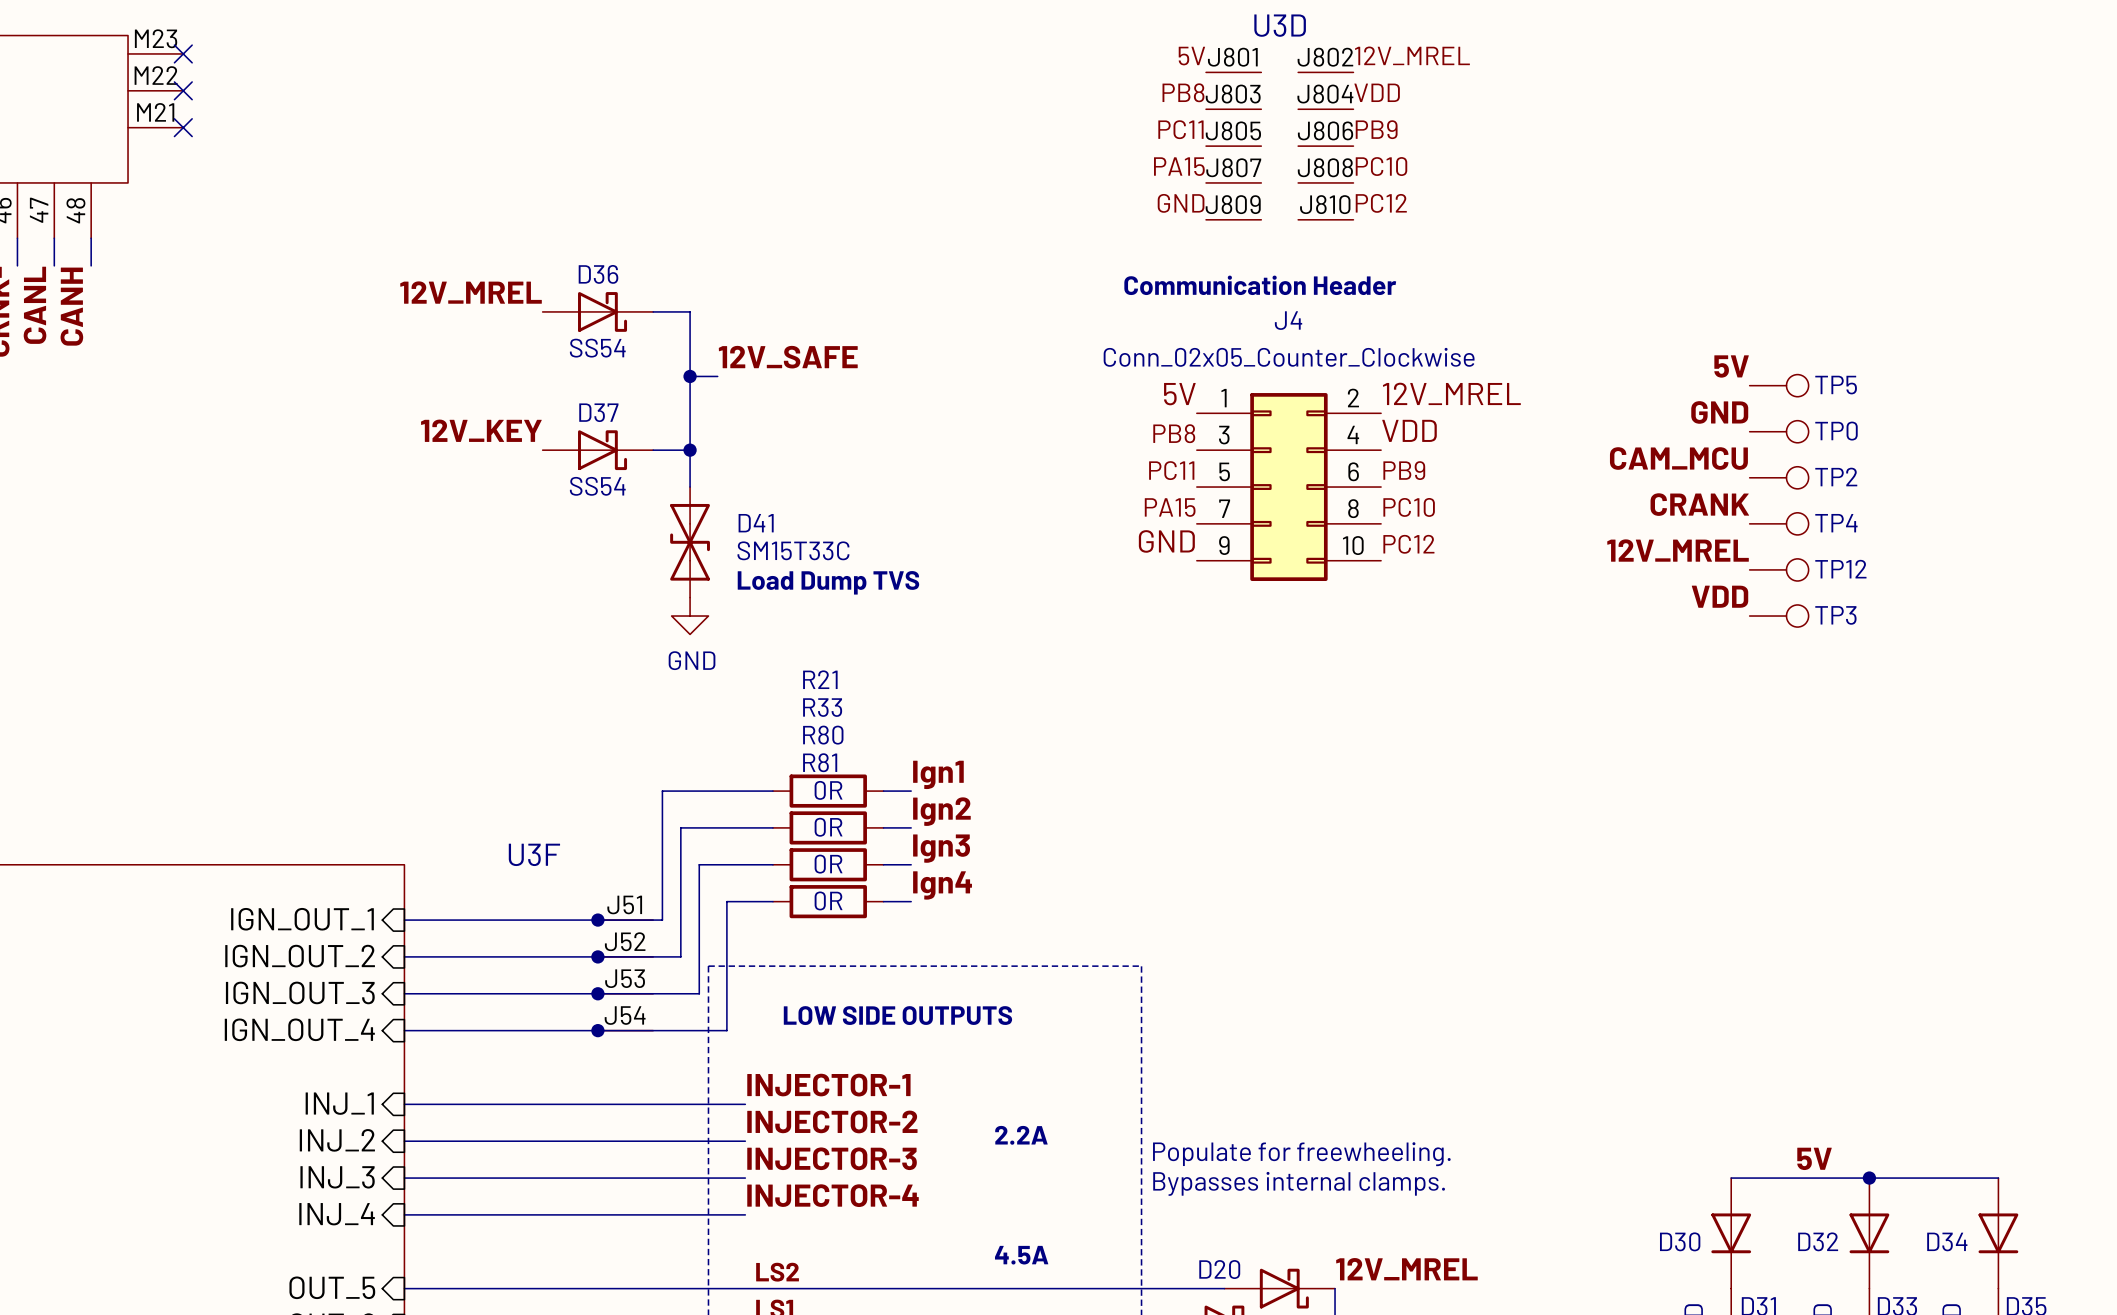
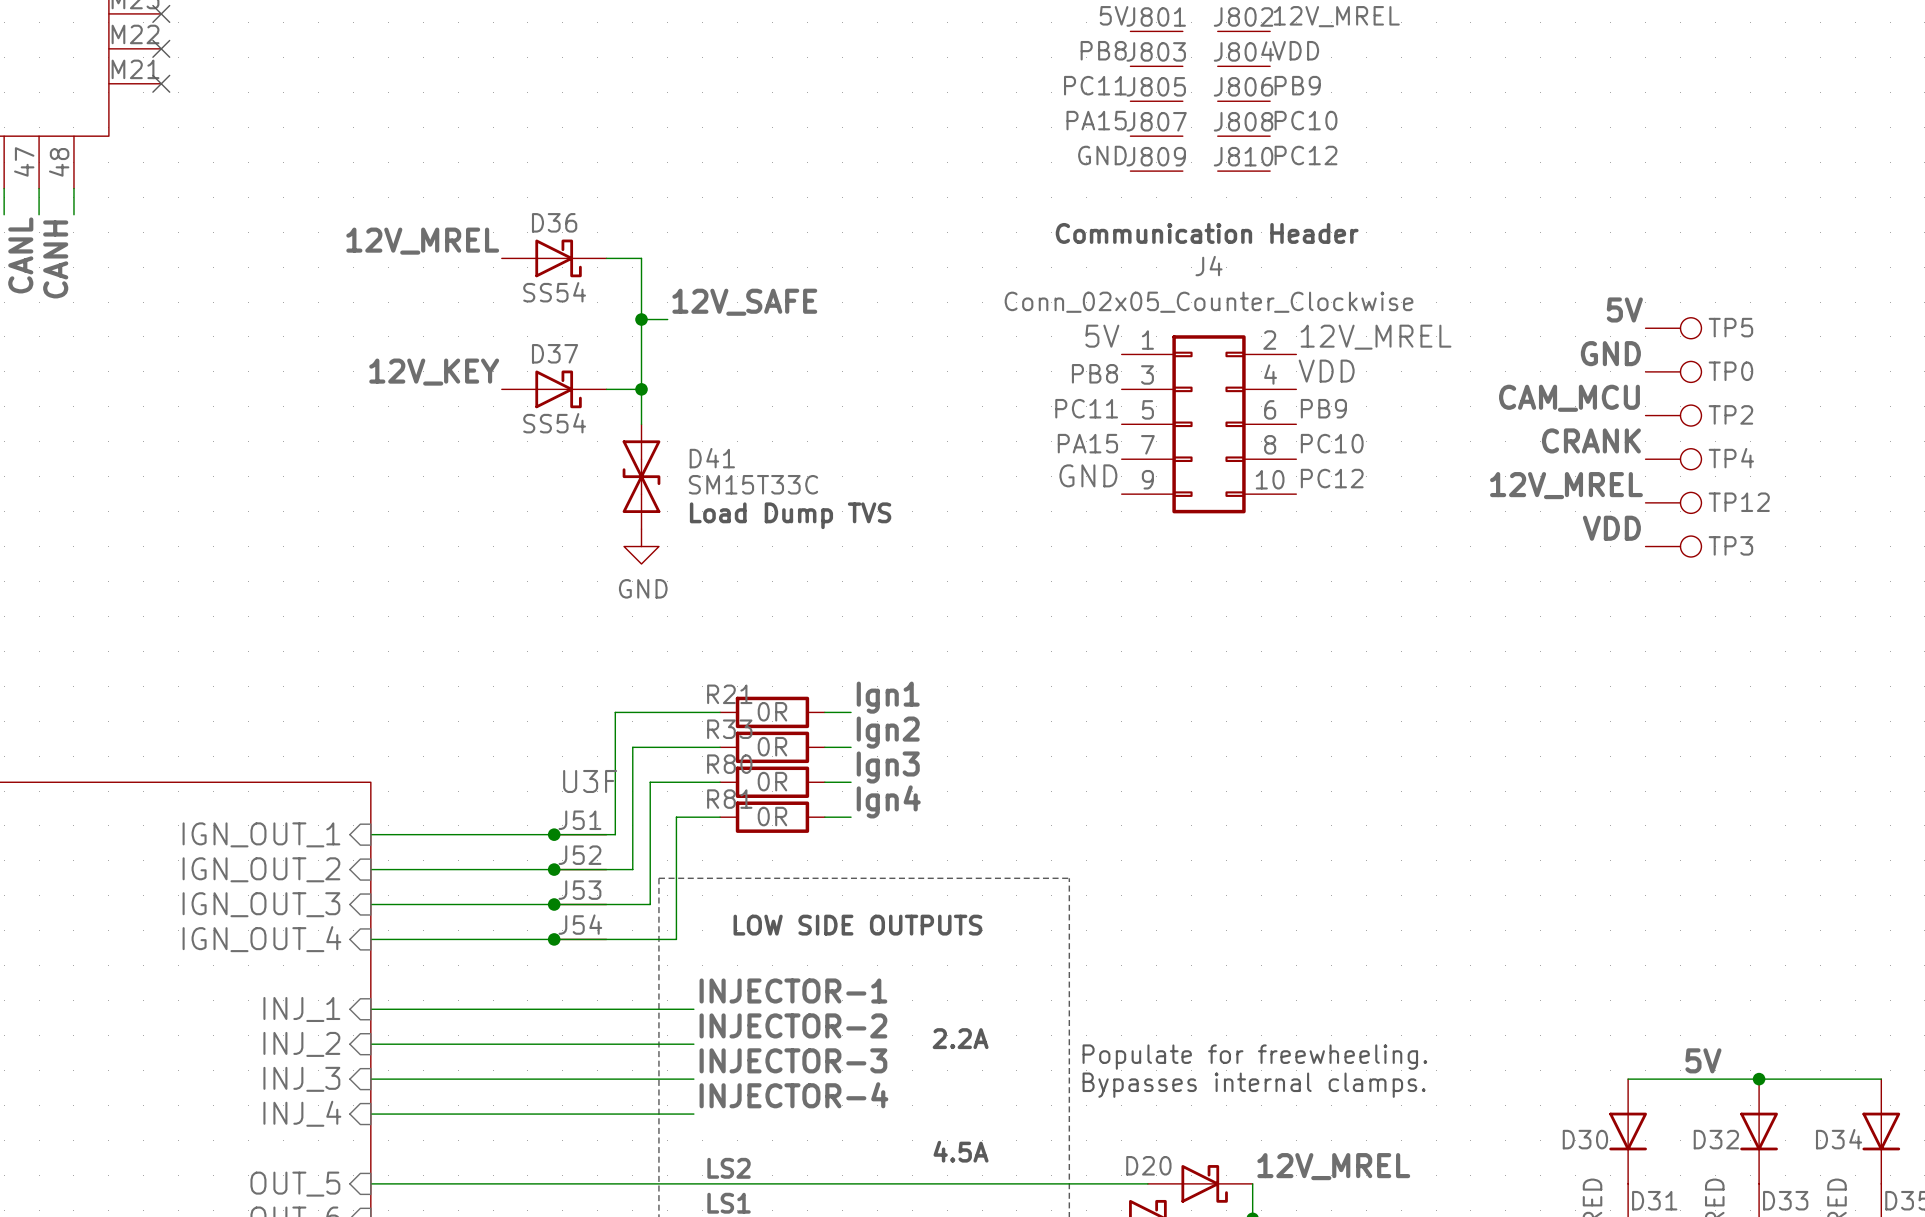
R21 name position: R21 (820, 679) -> R21 (729, 694)
R33 name position: R33 (822, 707) -> R33 (729, 729)
R80 name position: R80 (823, 735) -> R80 (729, 764)
R81 name position: R81 (820, 762) -> R81 (729, 799)
U3F name position: U3F (534, 854) -> U3F (590, 781)

